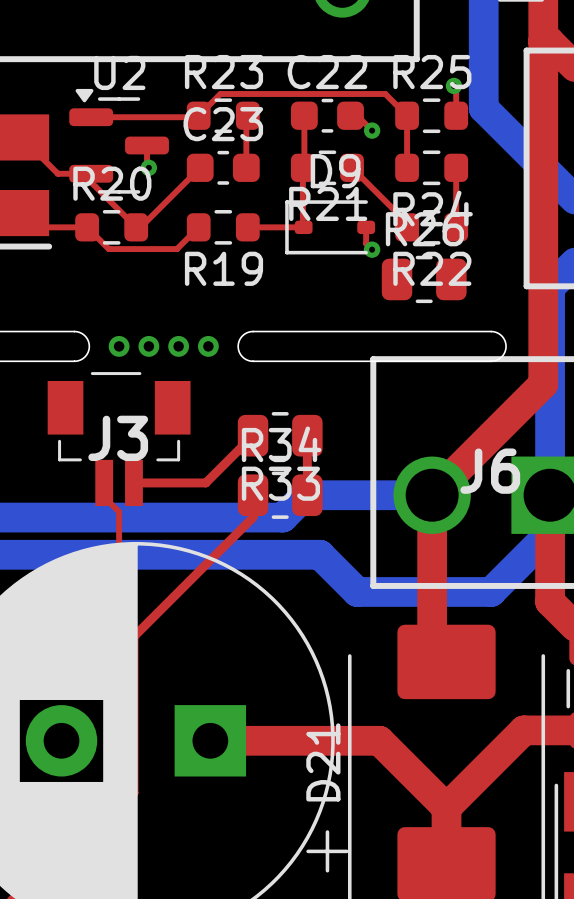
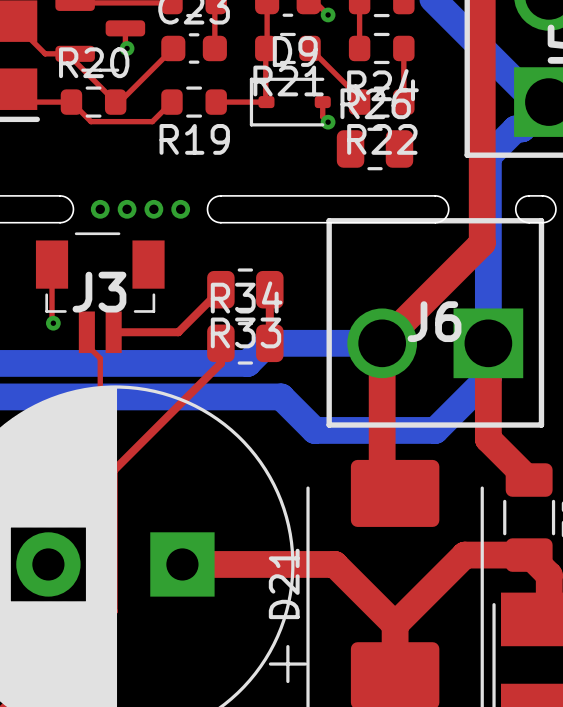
top track: none -> (52, 264) (53, 323)
via: none -> (53, 323)

